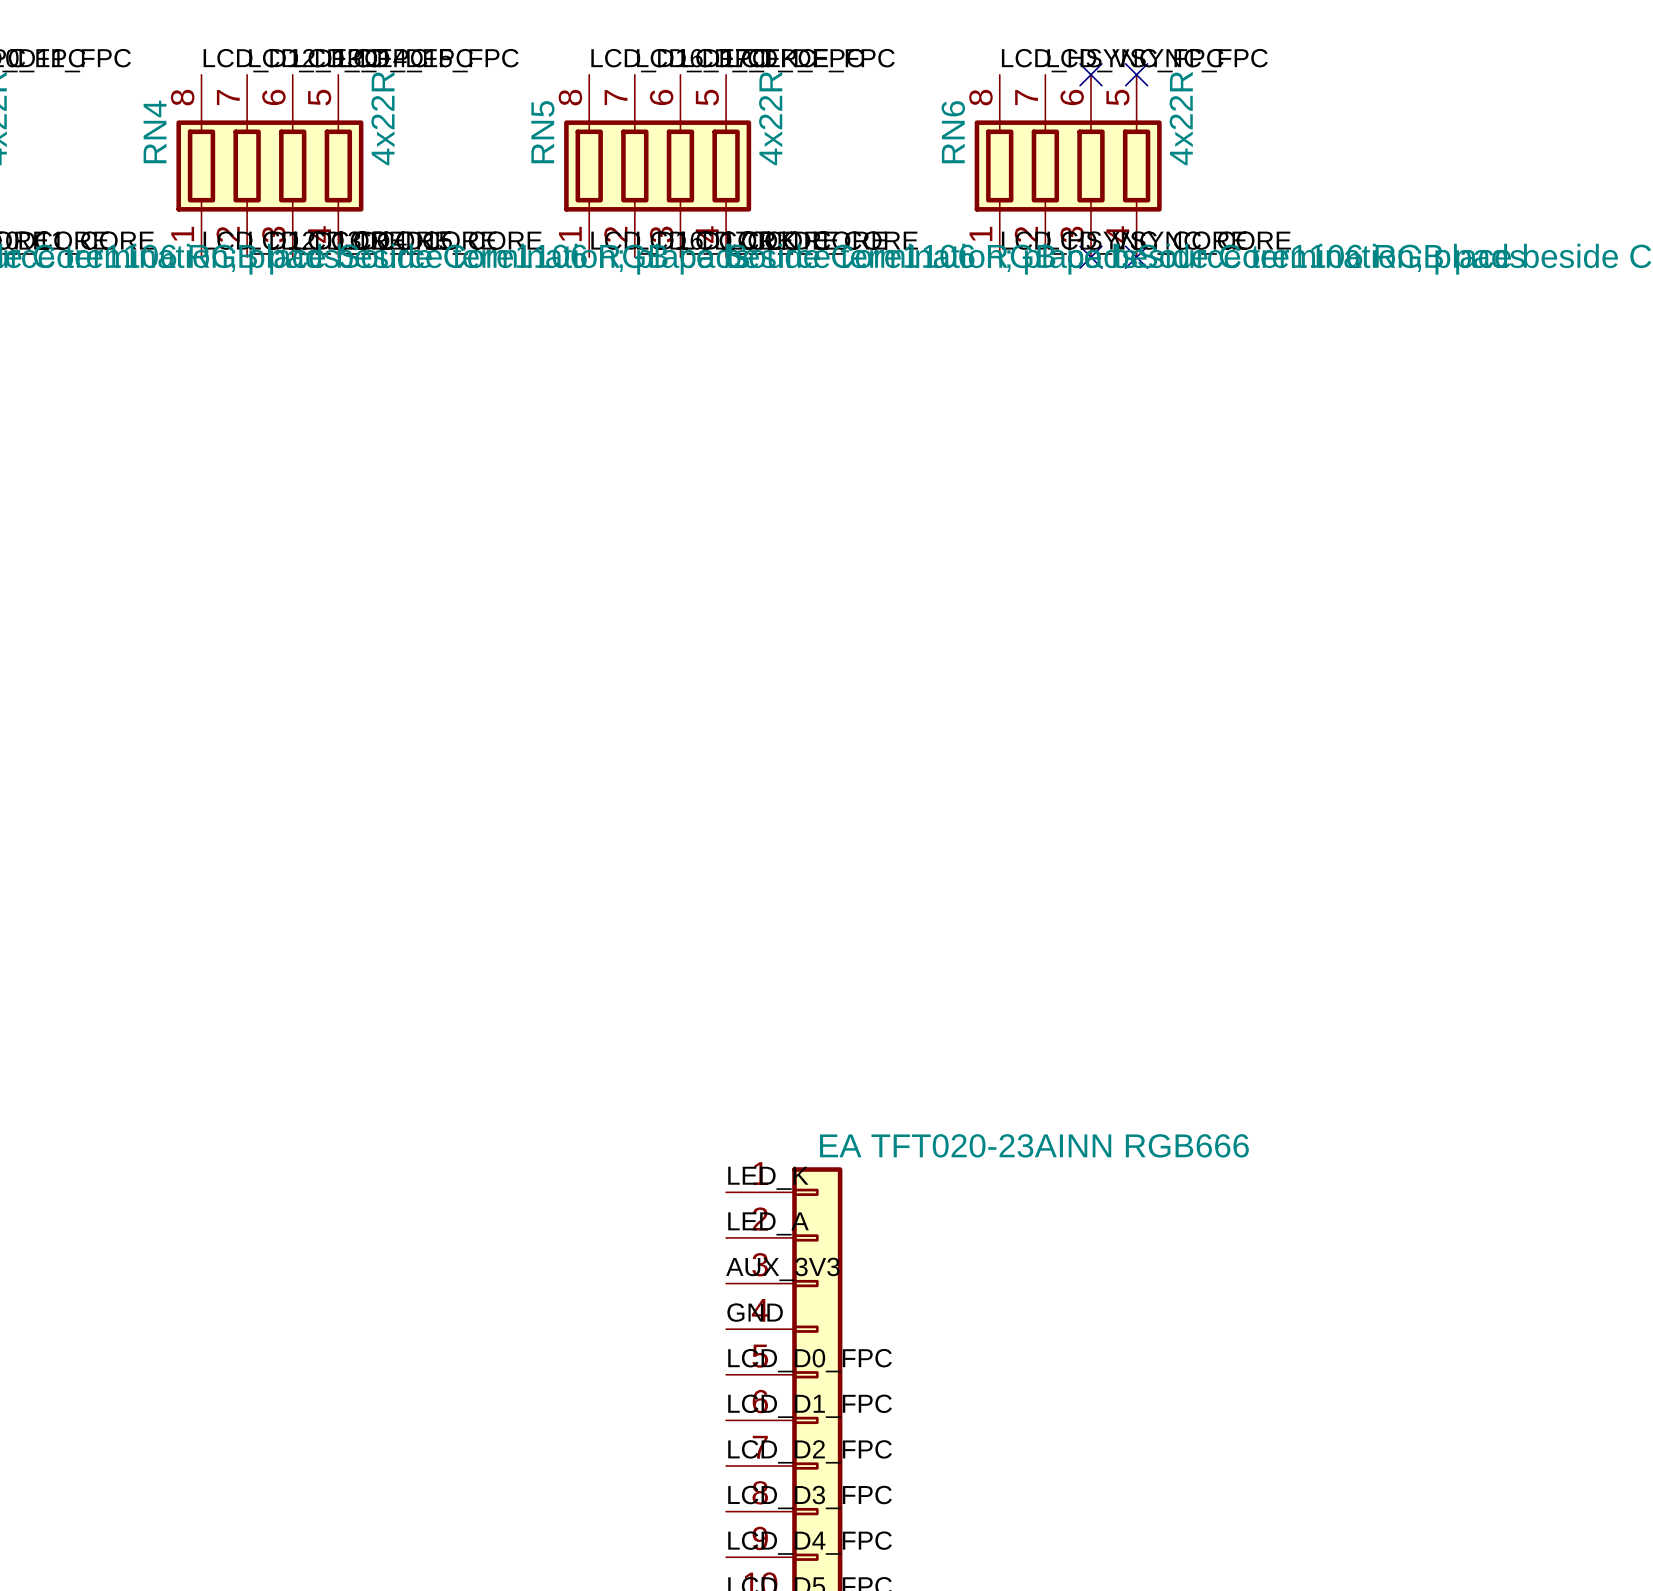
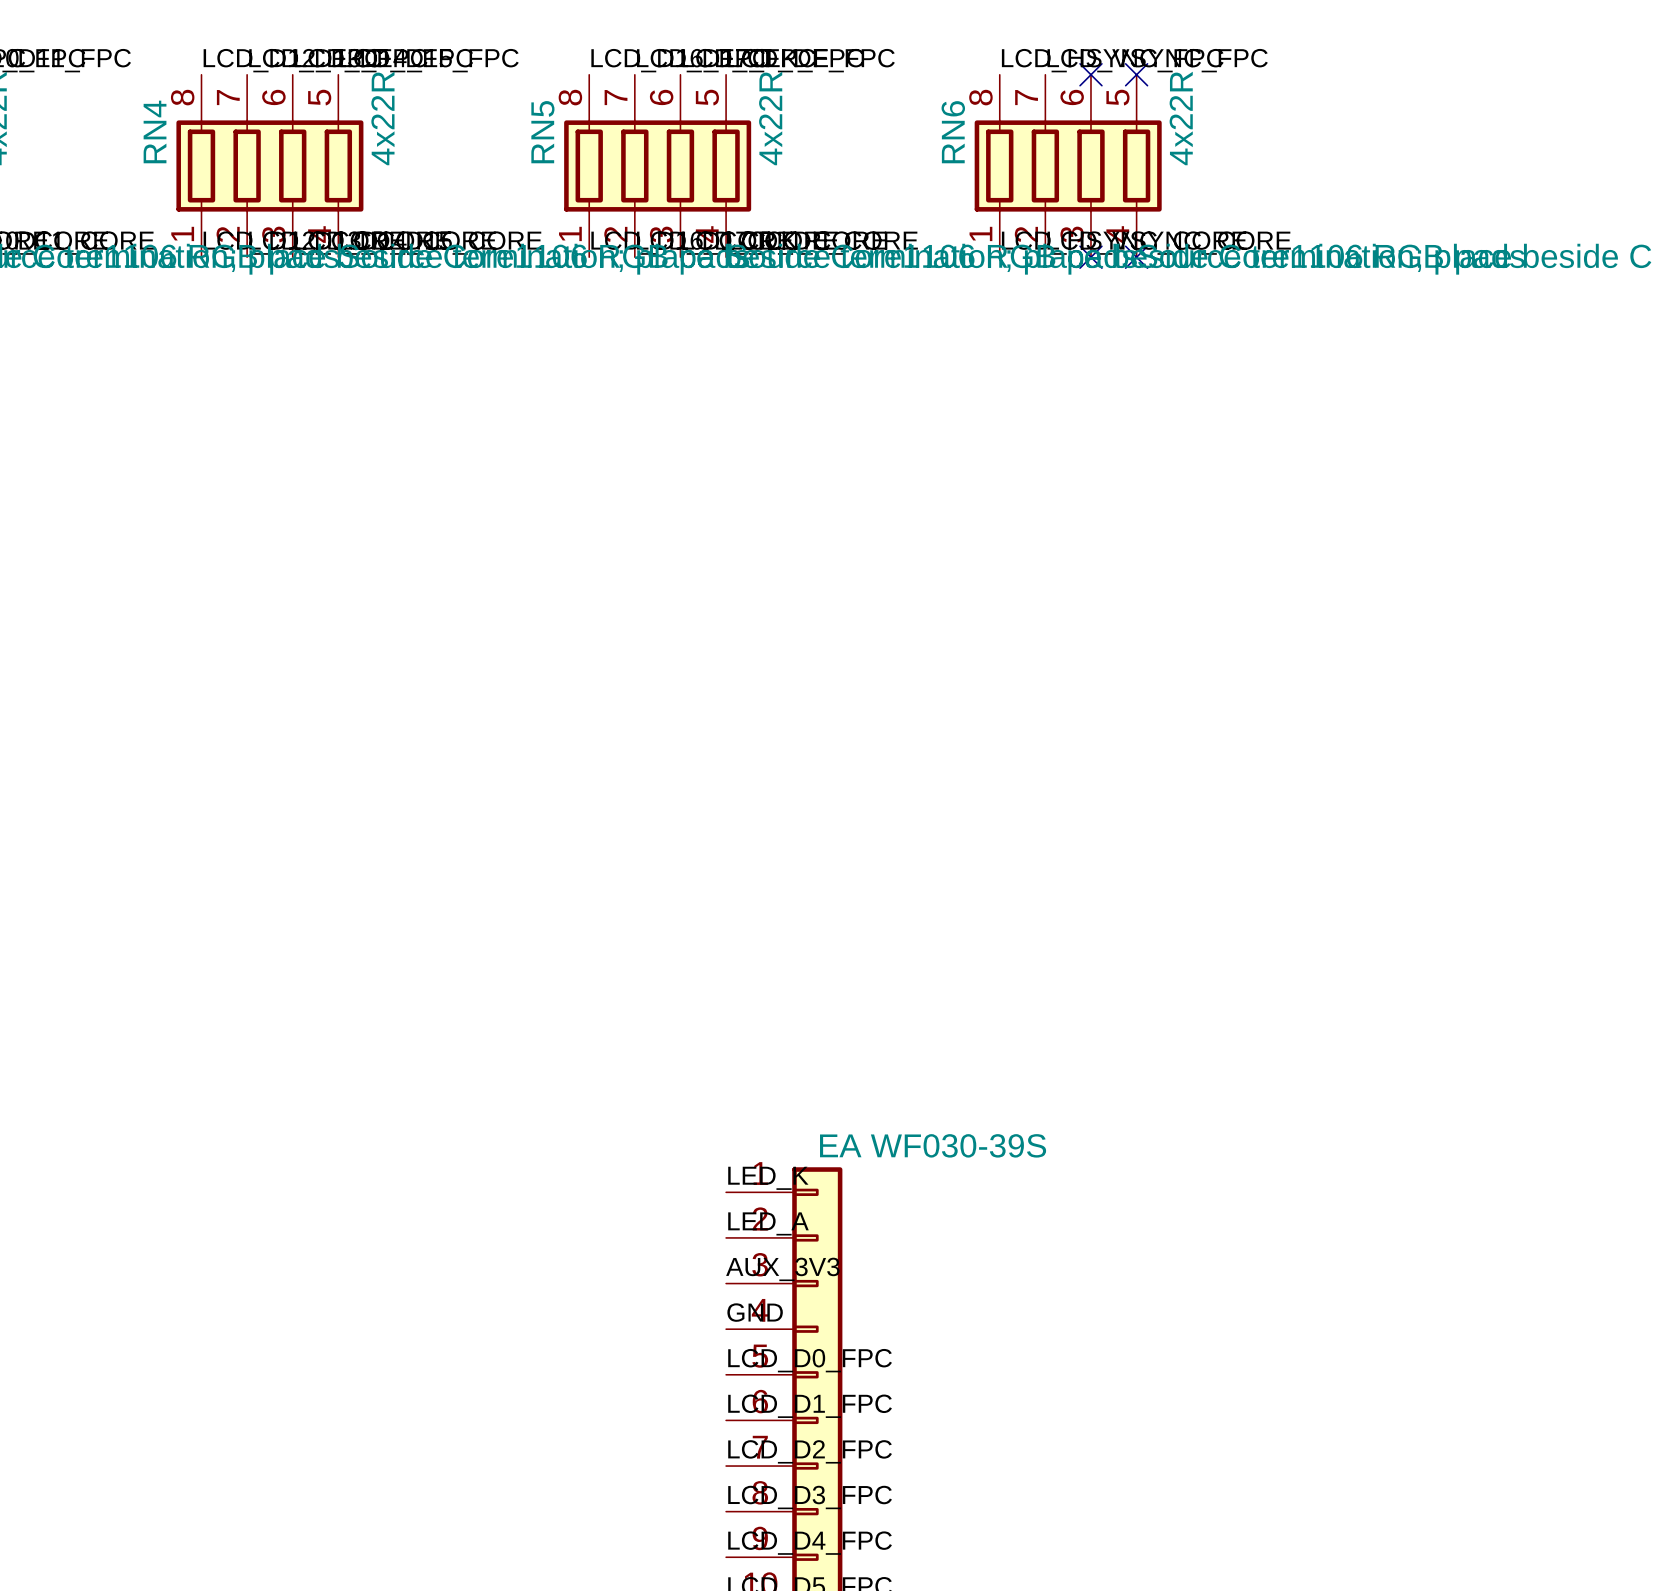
part value: EA TFT020-23AINN RGB666 (1034, 1145) -> EA WF030-39S (933, 1145)

